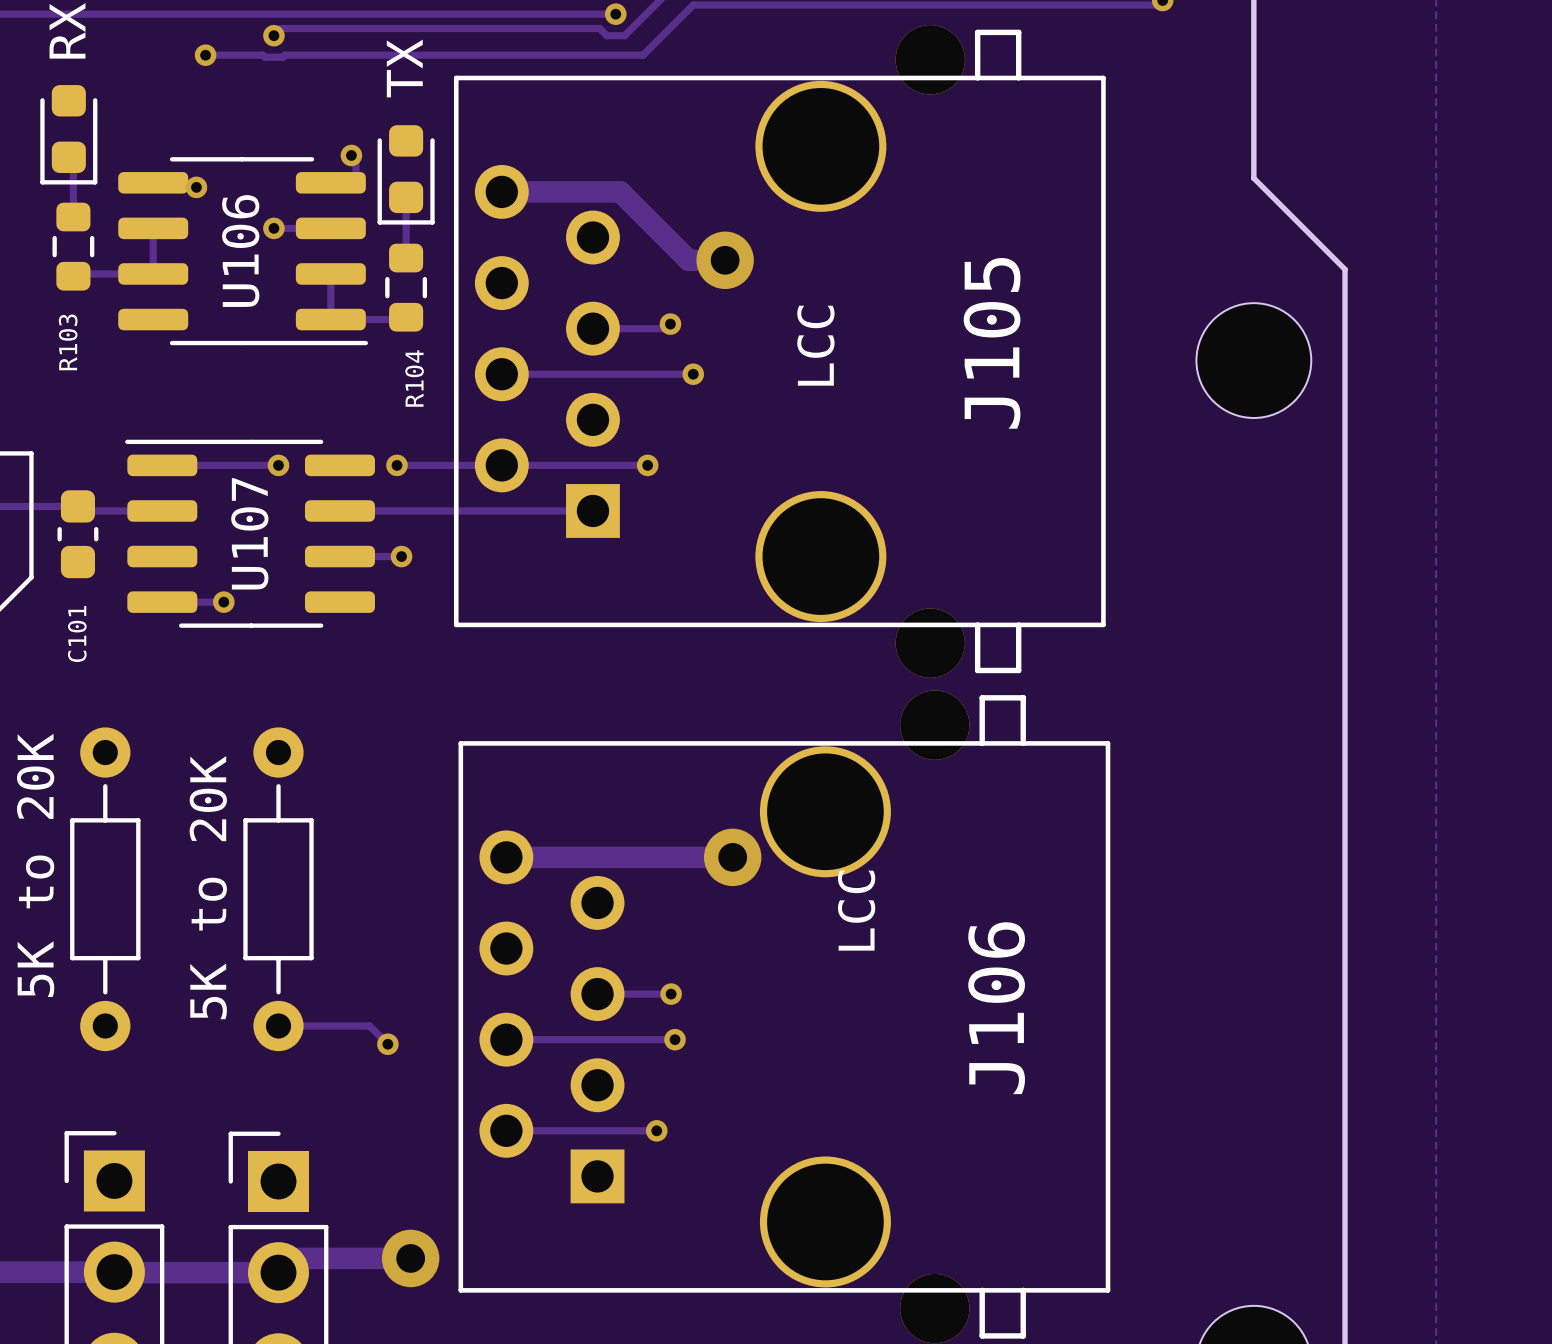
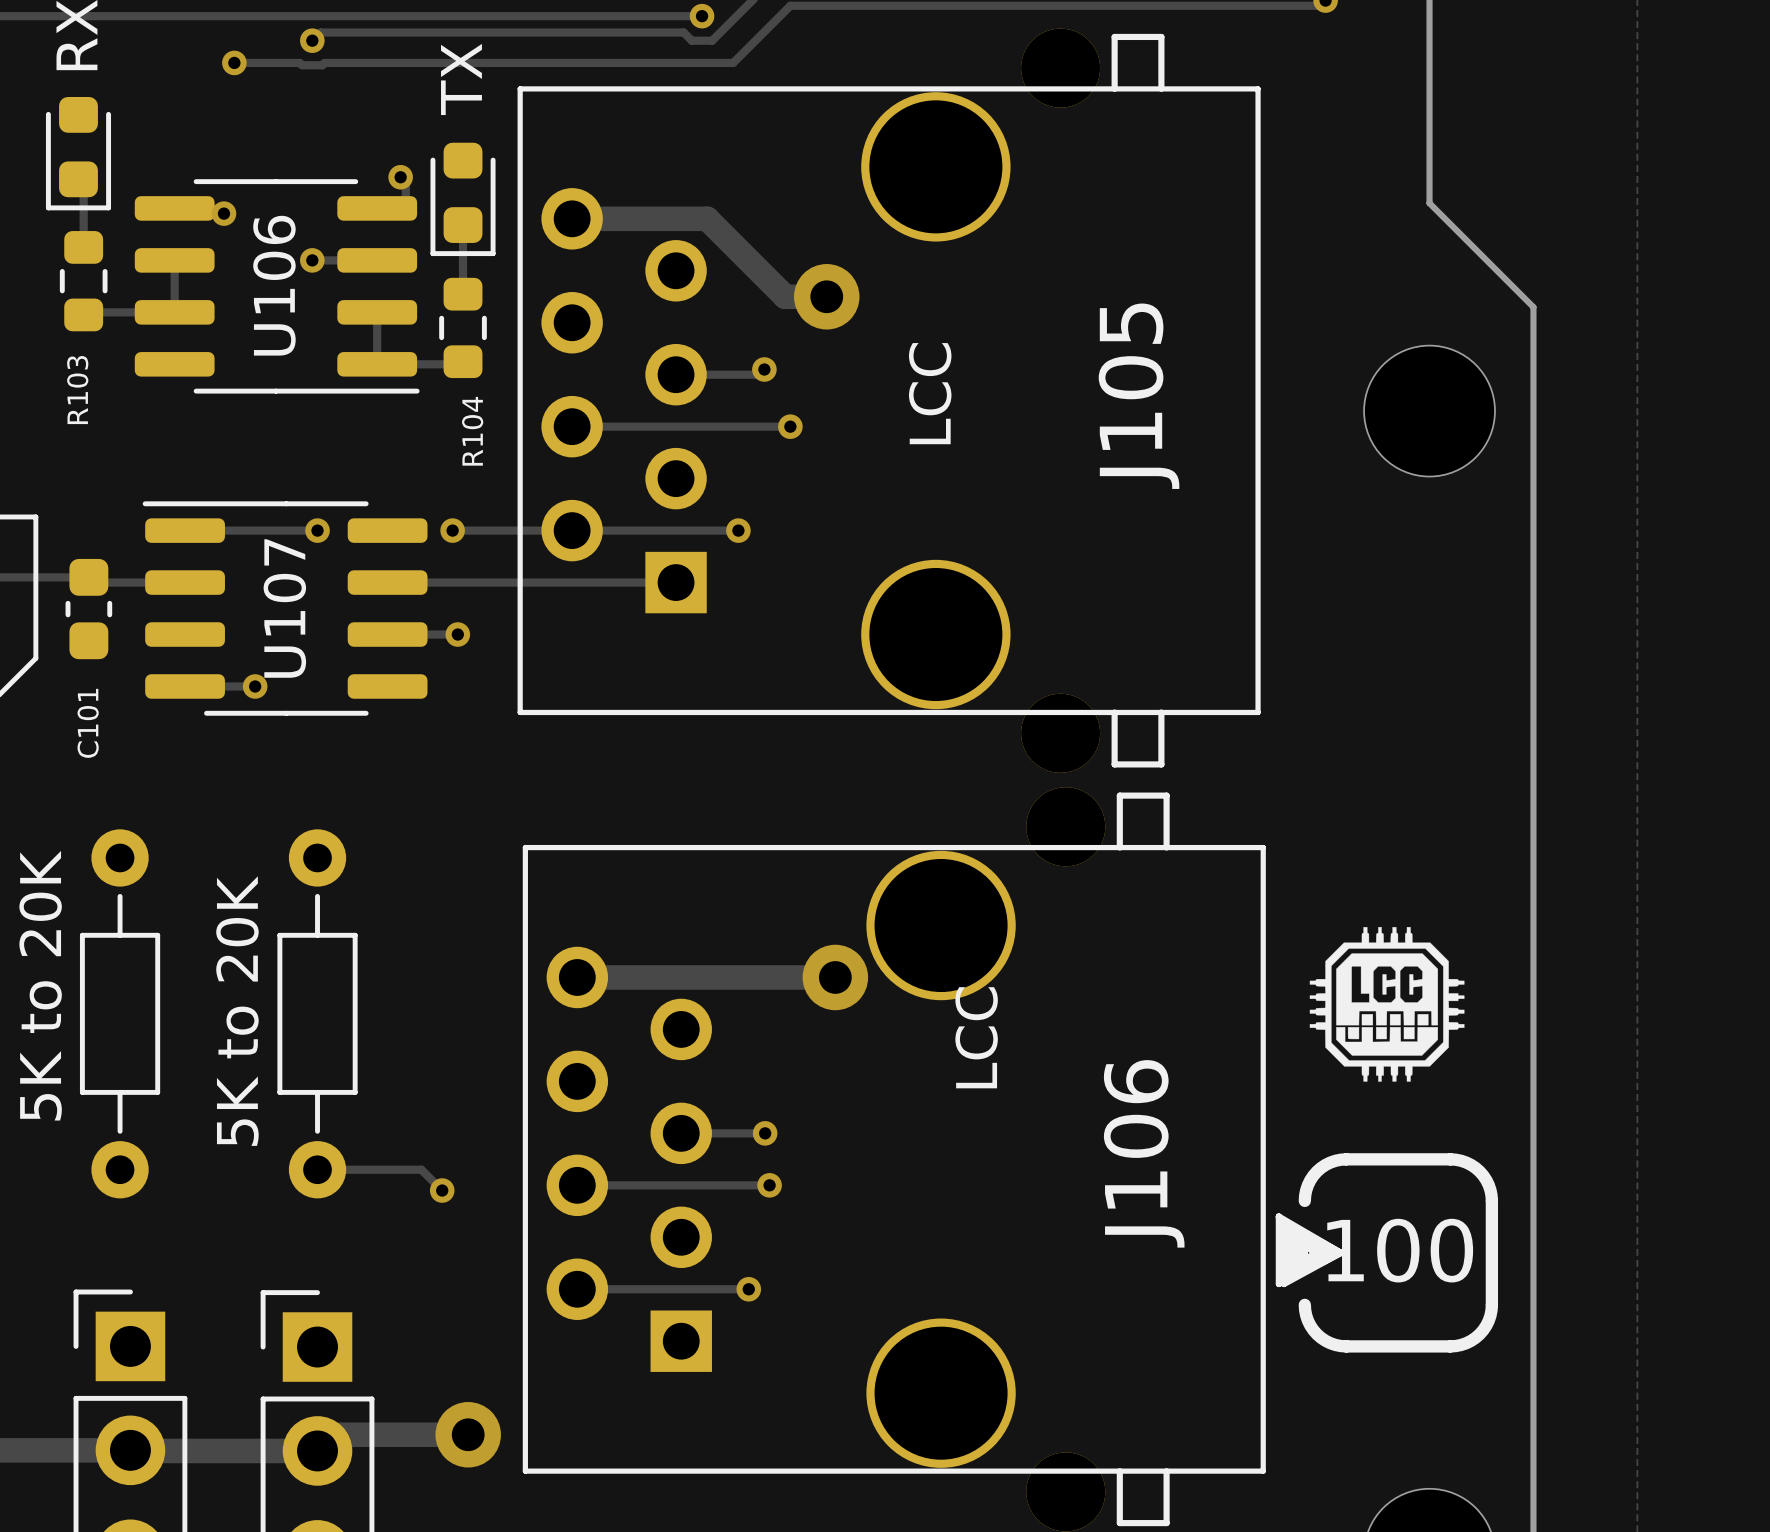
drawing: none -> [1309, 927, 1465, 1082]
drawing: none -> [1275, 1153, 1499, 1353]

